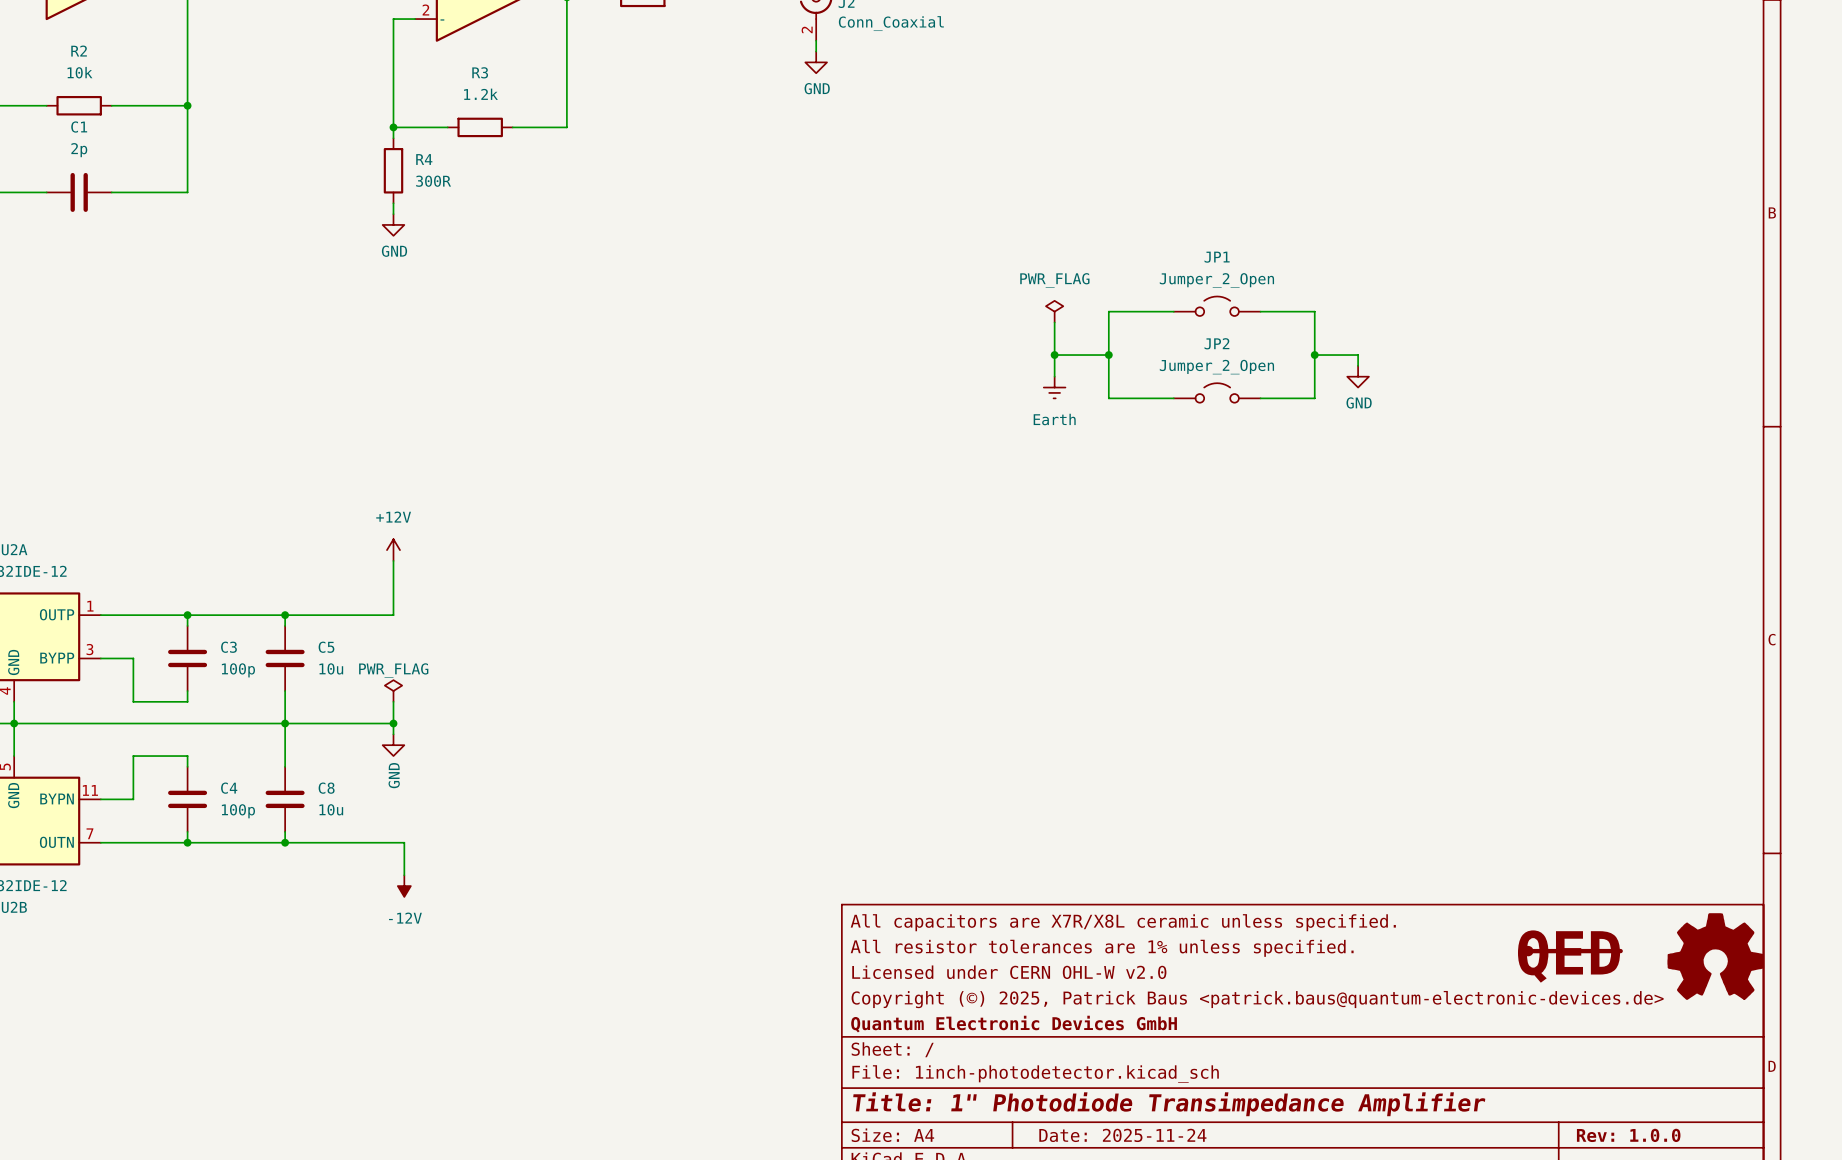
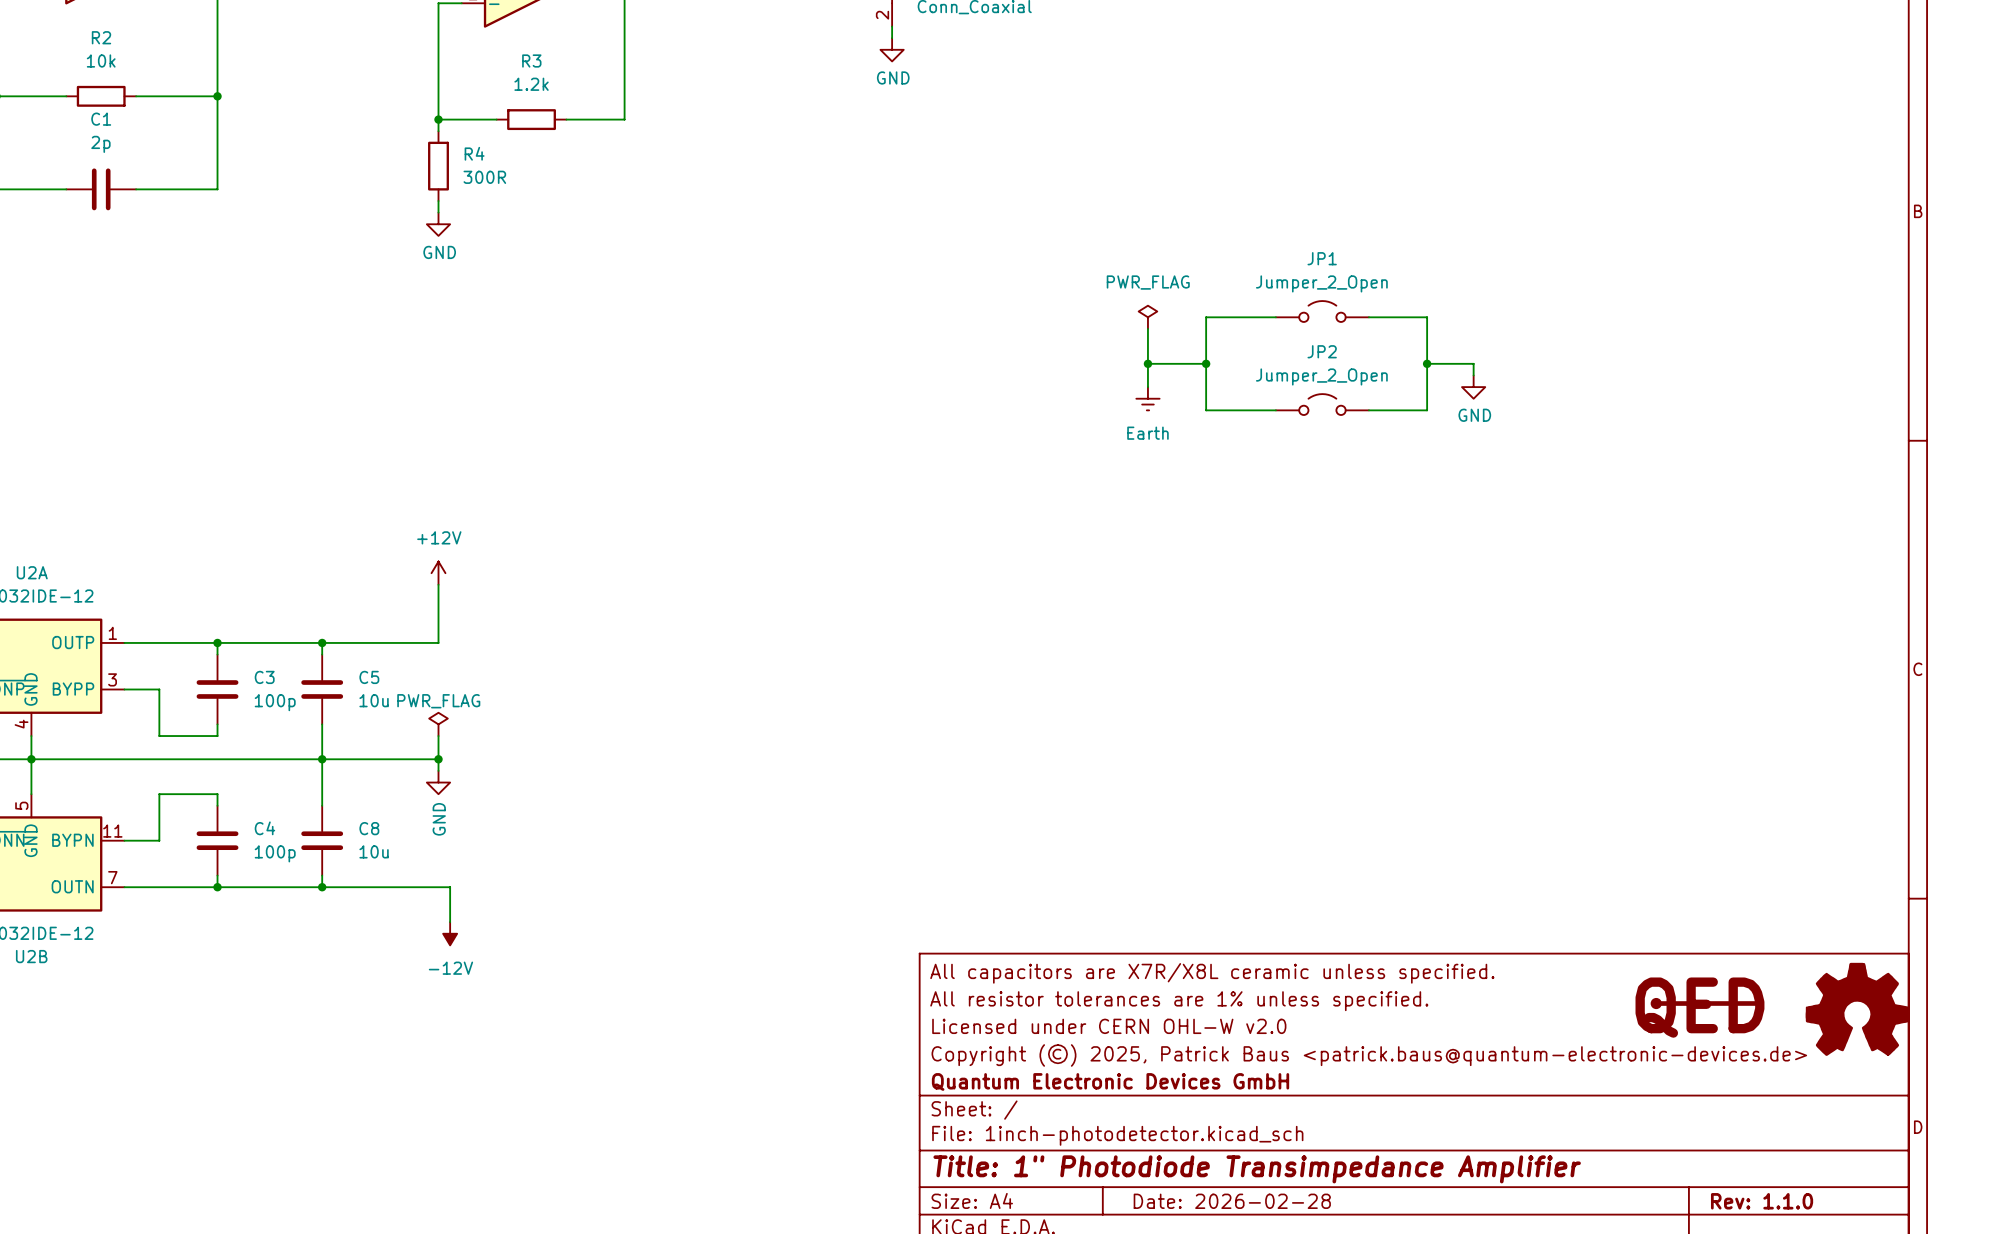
title block: Date: 2025-11-24 (1122, 1135) -> Date: 2026-02-28 (1232, 1201)
title block: Rev: 1.0.0 (1628, 1135) -> Rev: 1.1.0 (1762, 1201)

